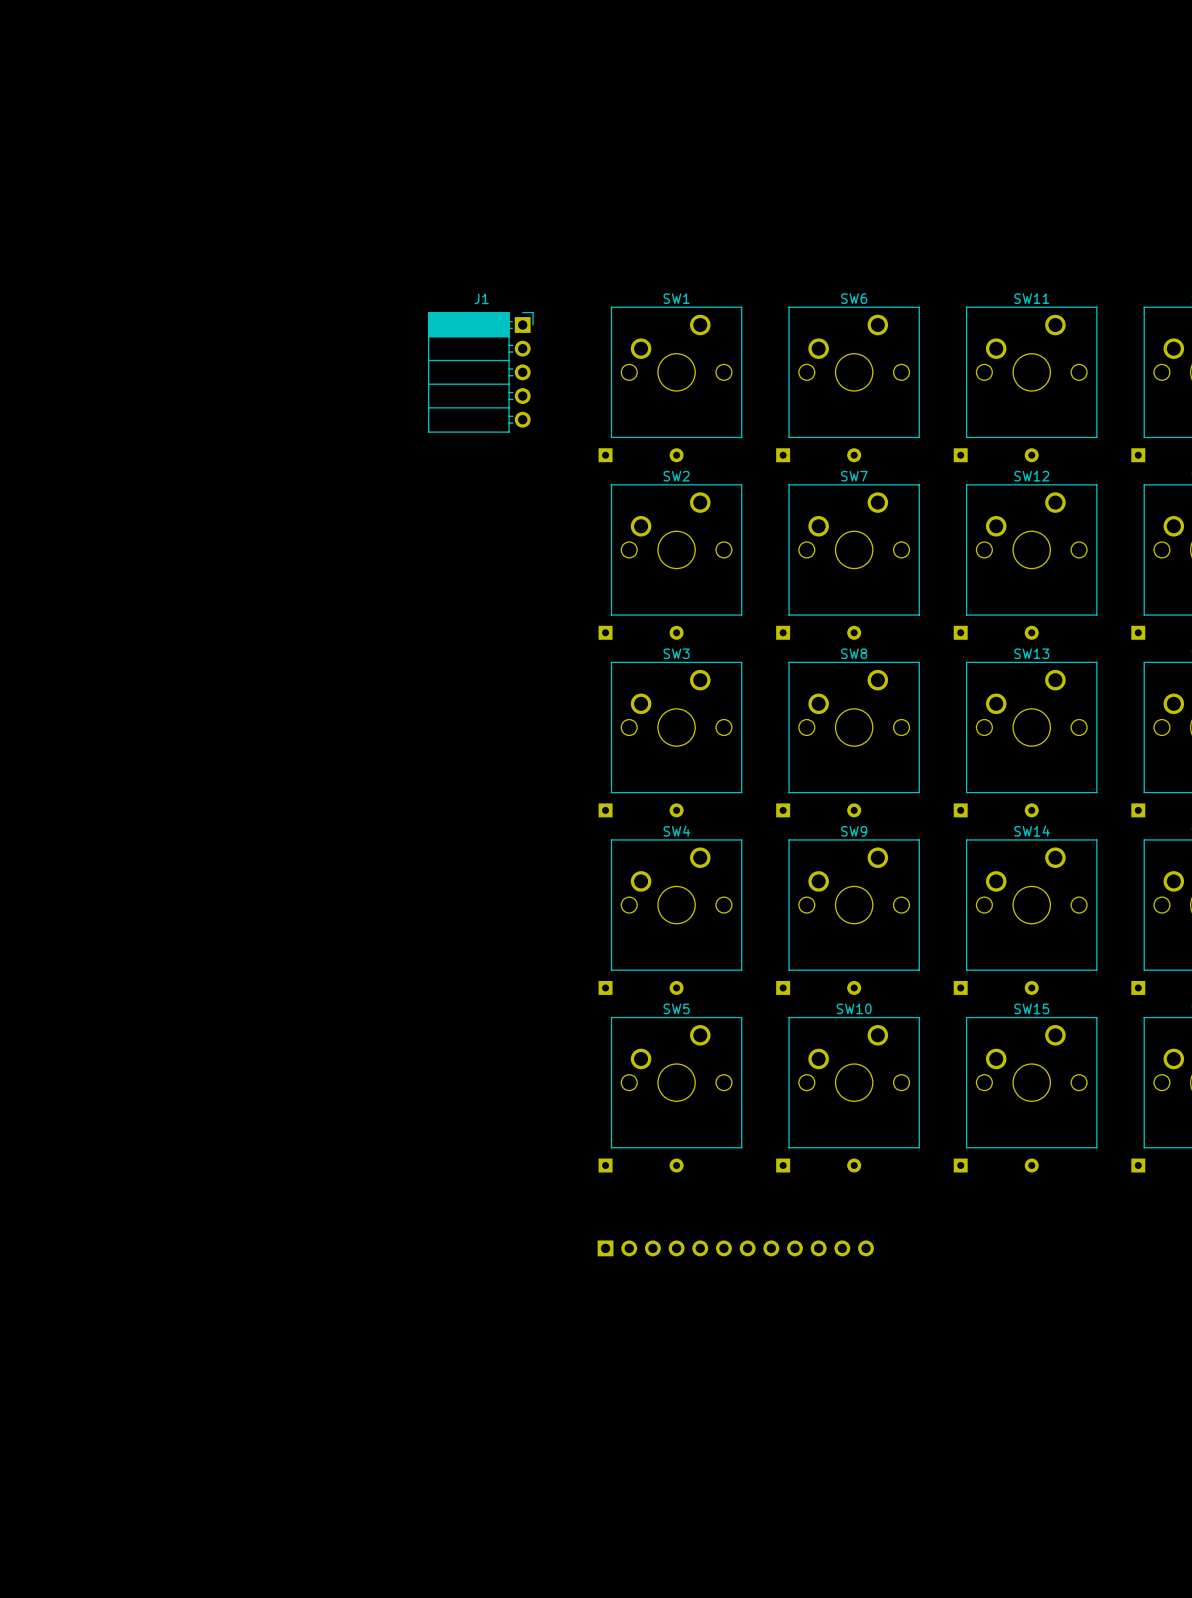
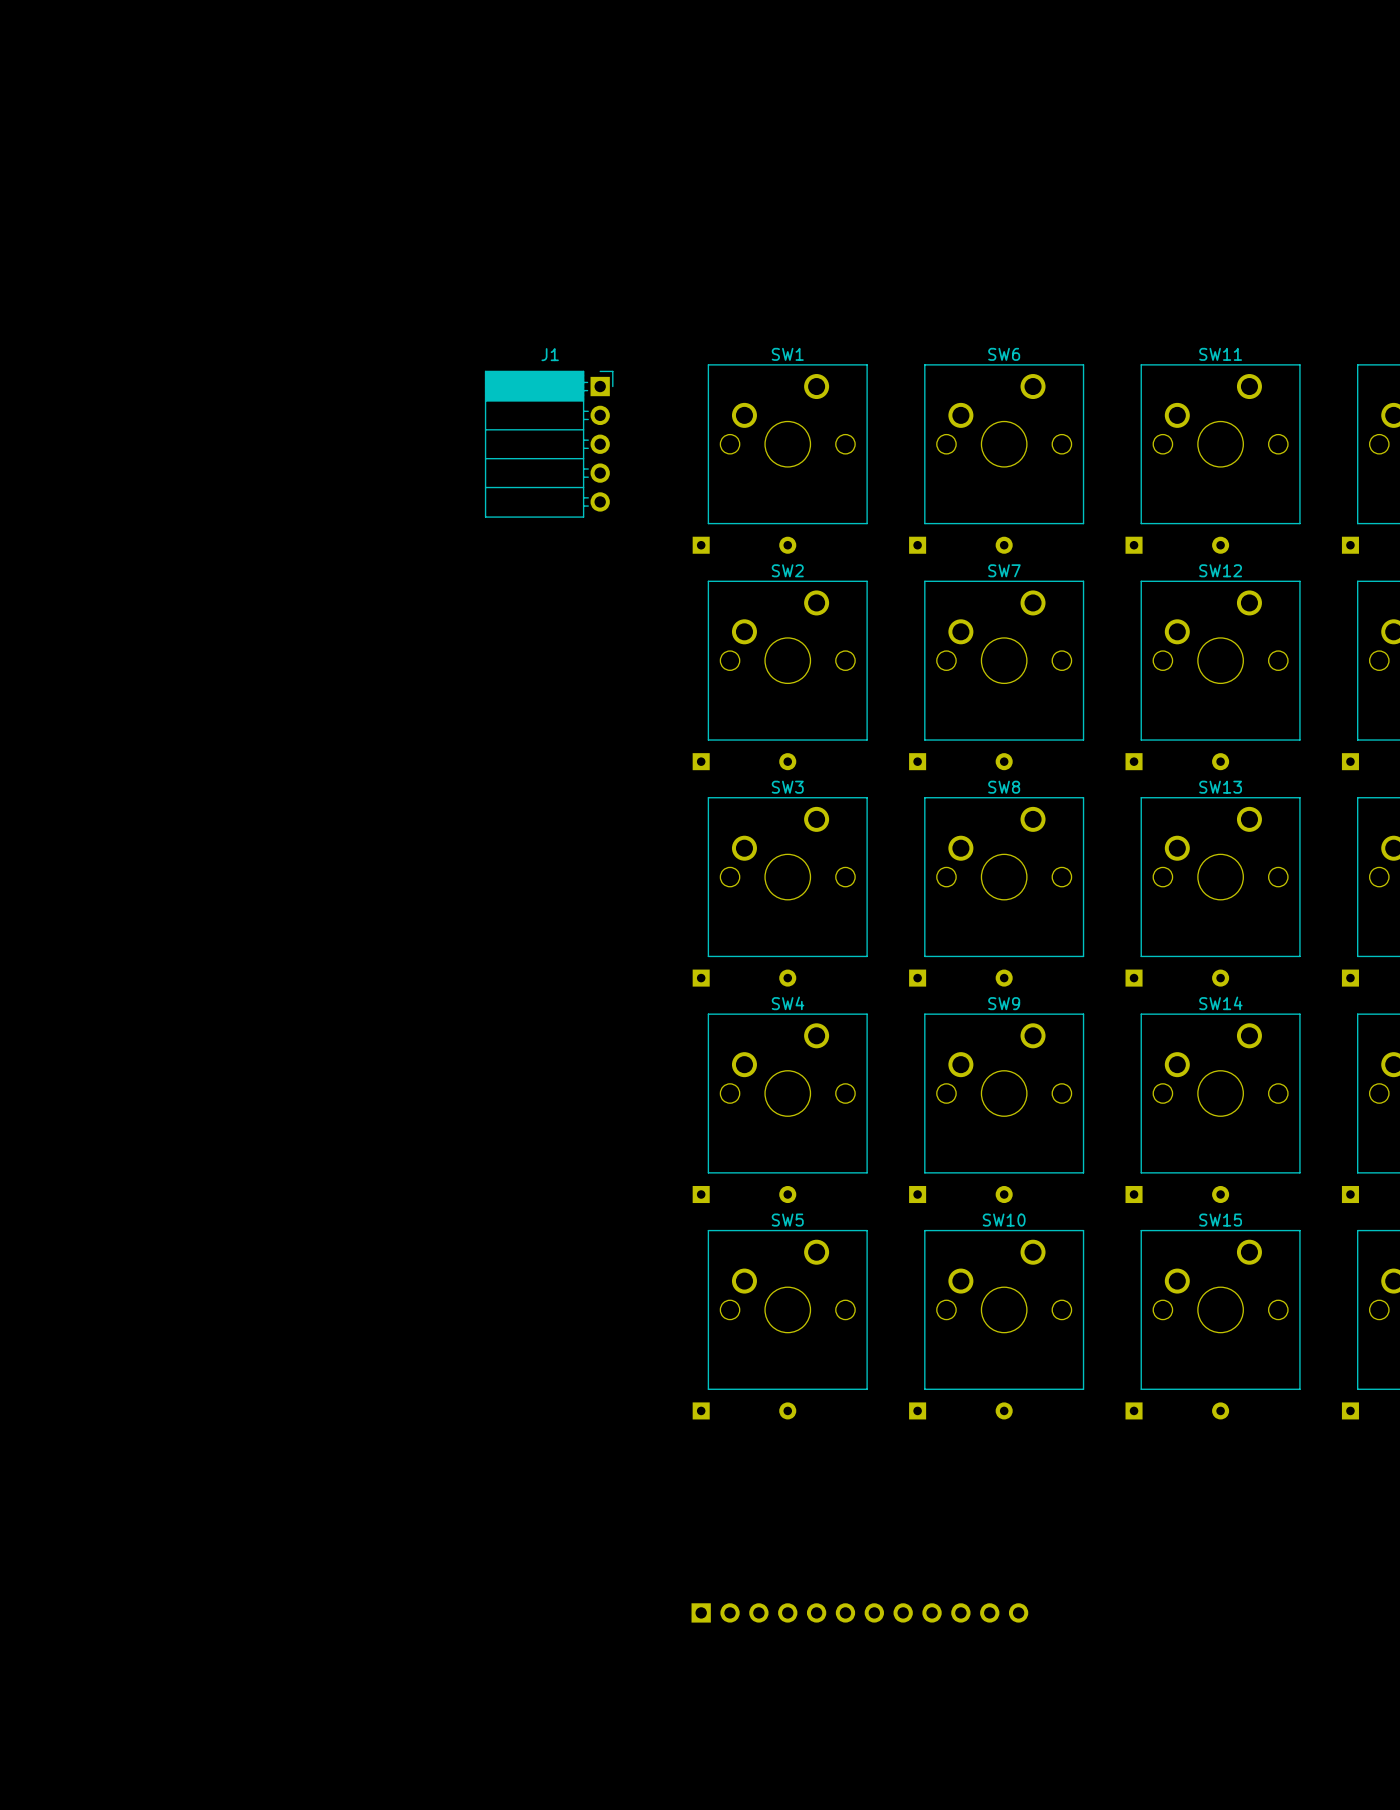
part position: (735, 1248) -> (859, 1612)

